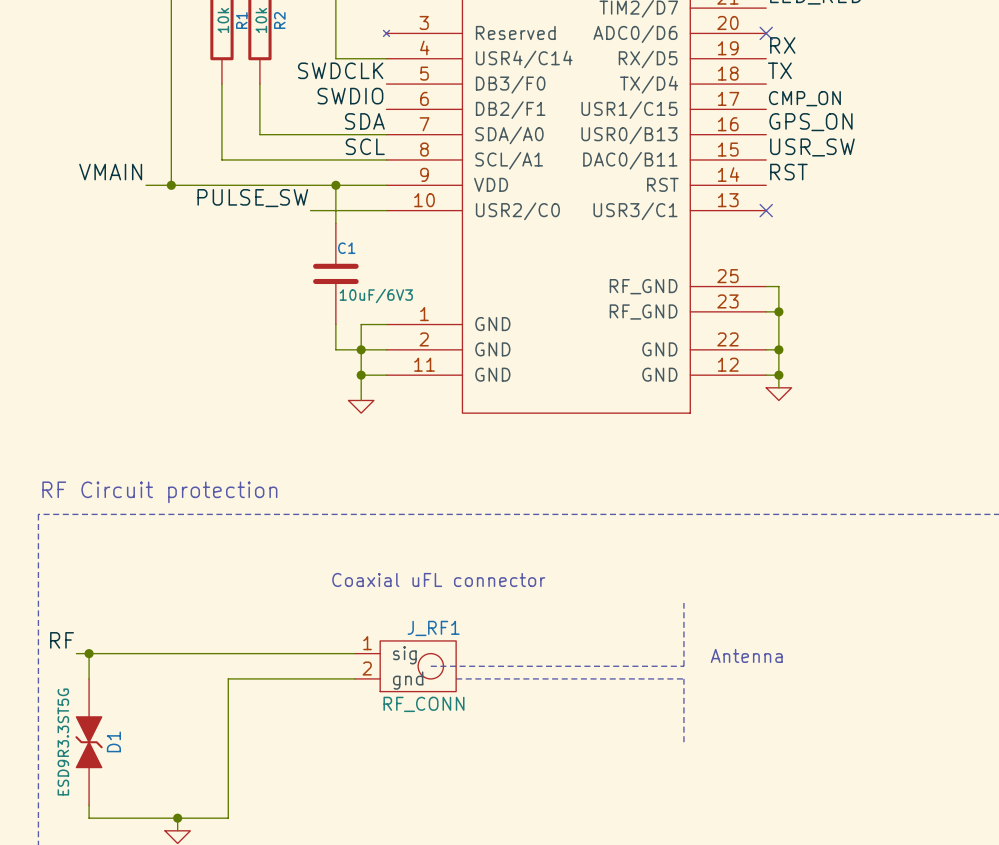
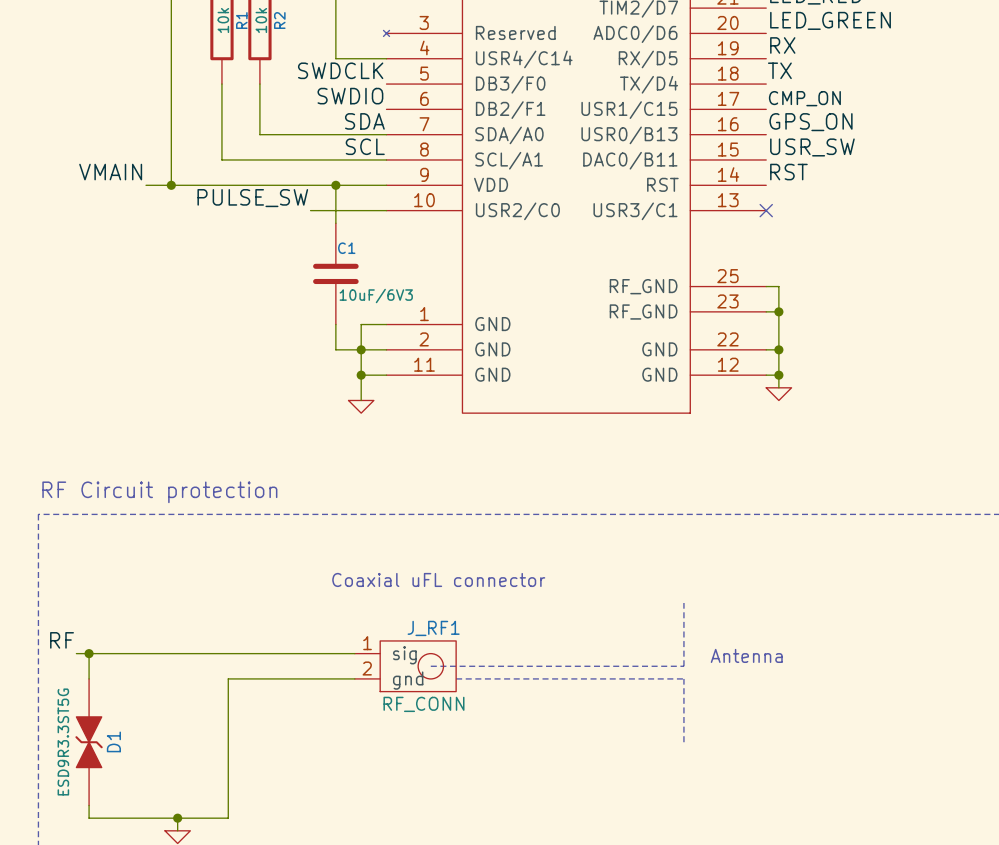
label: none -> LED_GREEN (830, 20)
no-connect mark: (766, 33) -> none

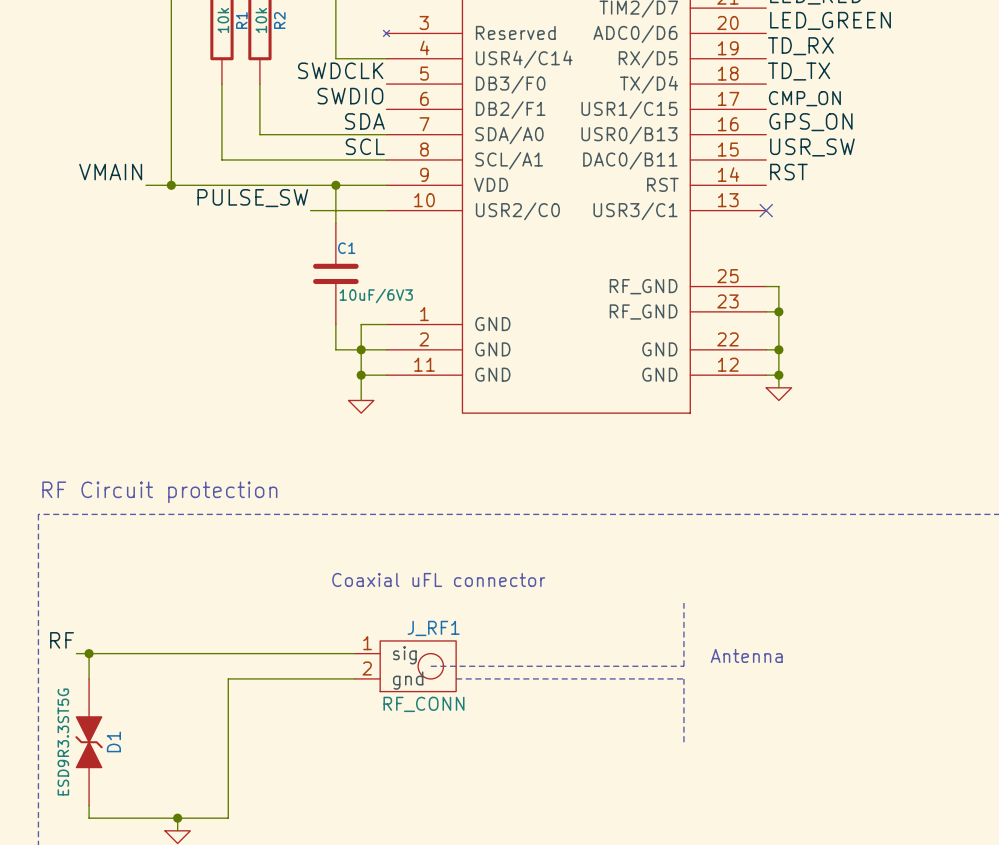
label: RX (782, 45) -> TD_RX (800, 46)
label: TX (779, 70) -> TD_TX (799, 71)

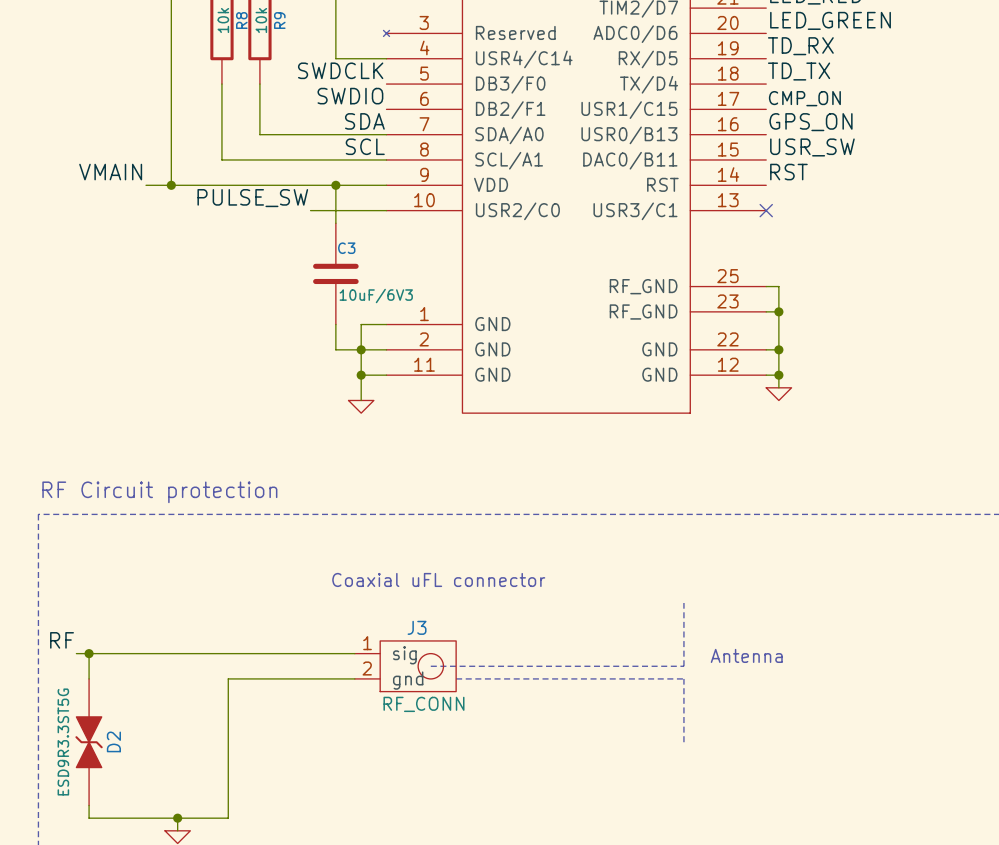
R1 name: R1 (241, 20) -> R8 (241, 20)
R2 name: R2 (279, 20) -> R9 (279, 20)
C1 name: C1 (346, 248) -> C3 (346, 248)
J_RF1 name: J_RF1 (433, 628) -> J3 (417, 627)
D1 name: D1 (113, 741) -> D2 (113, 741)

